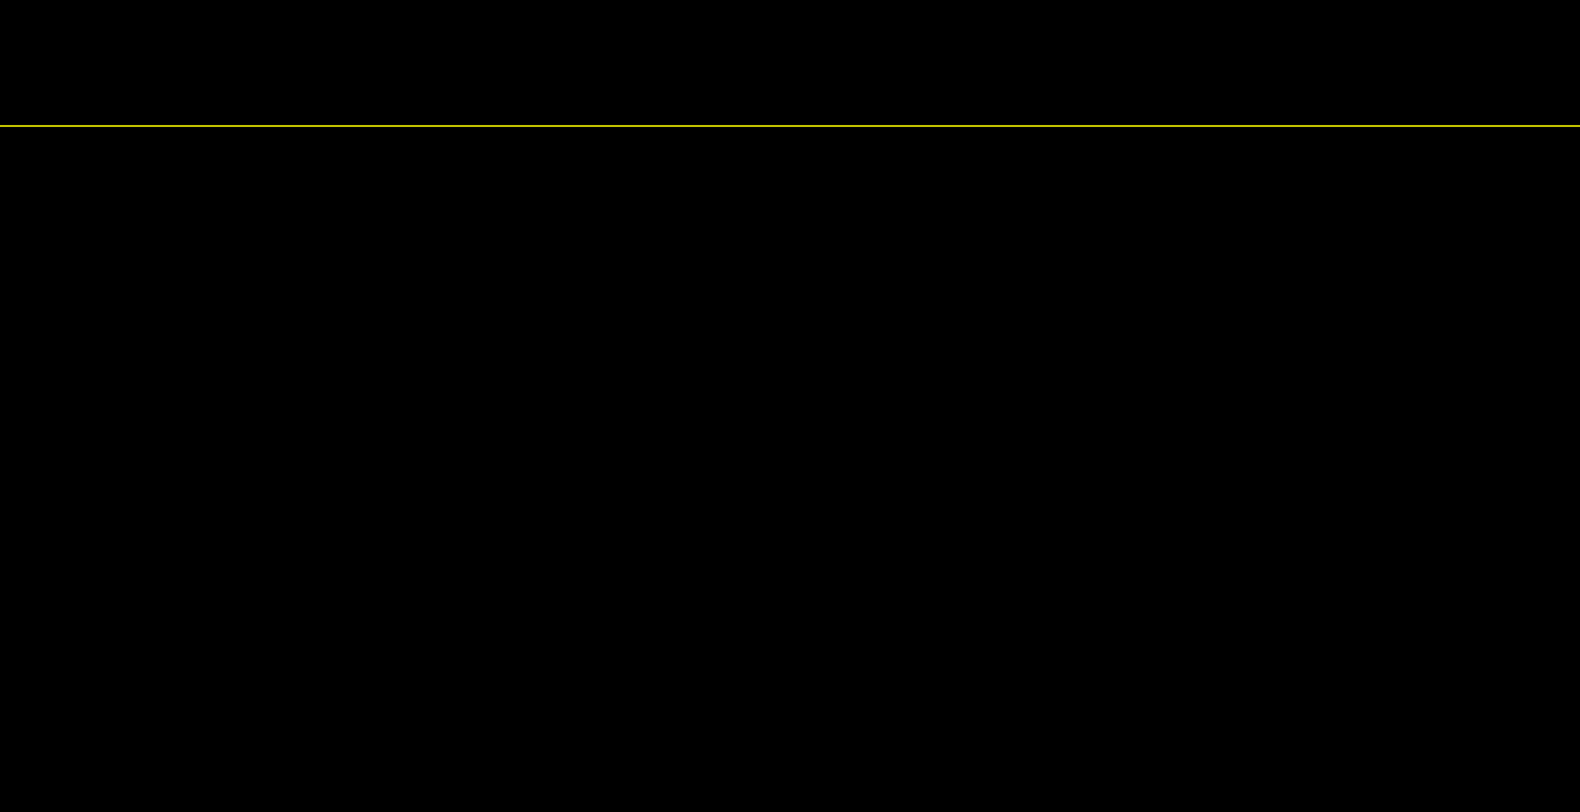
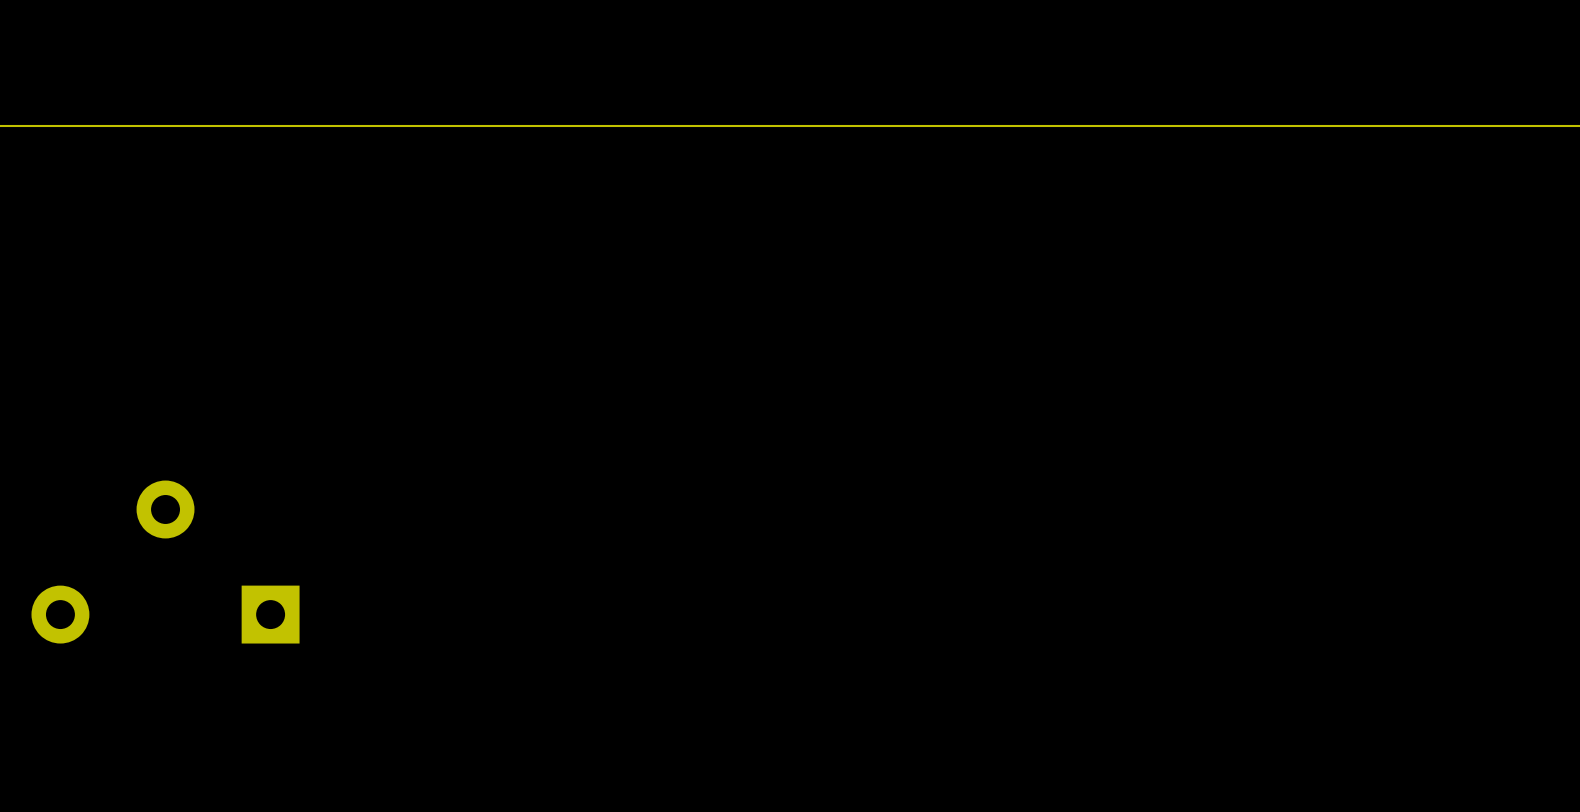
part: none -> (165, 562)

